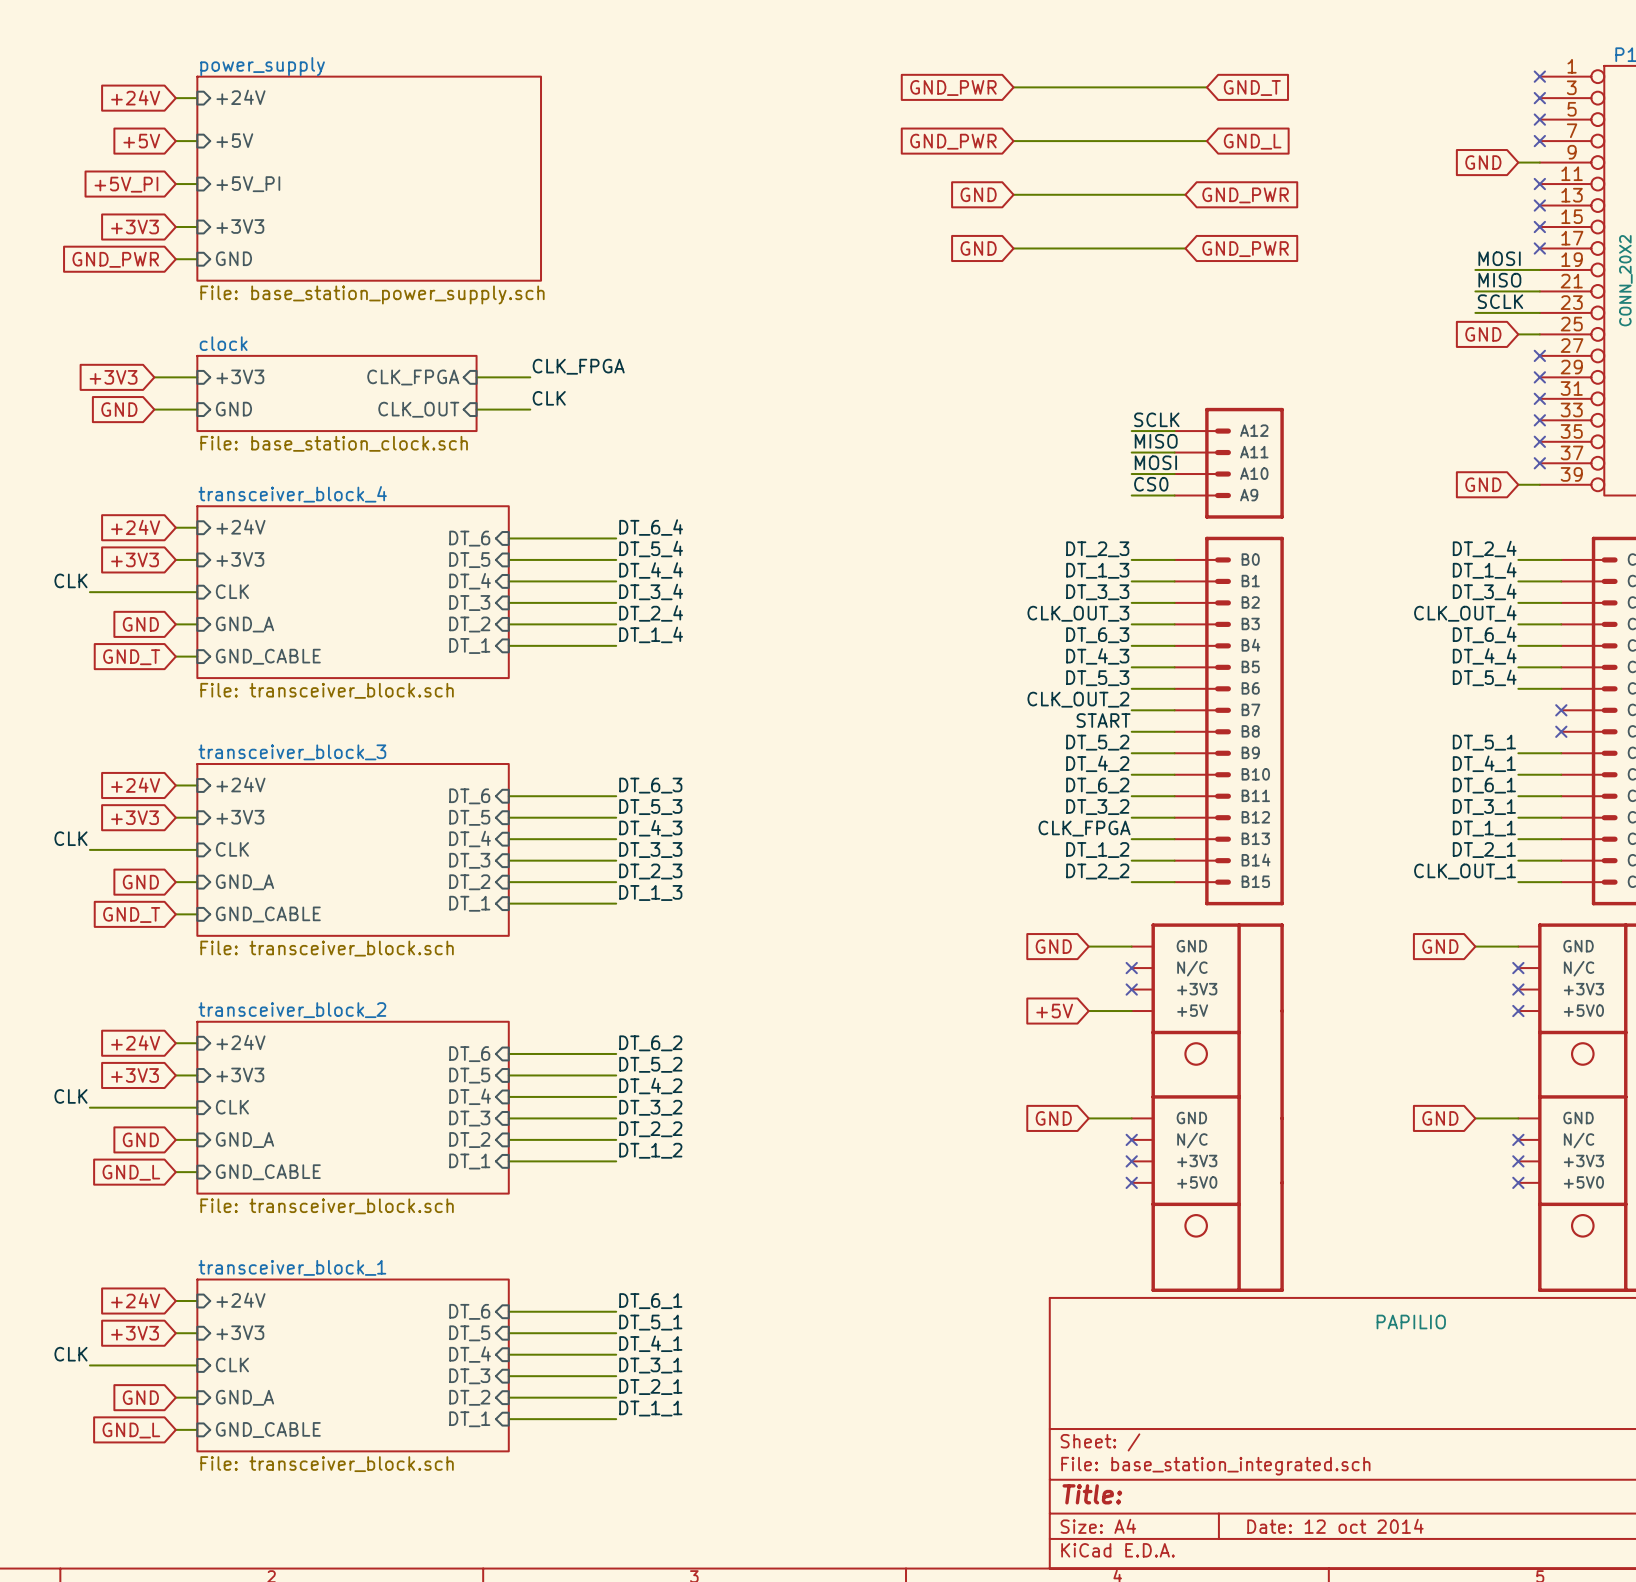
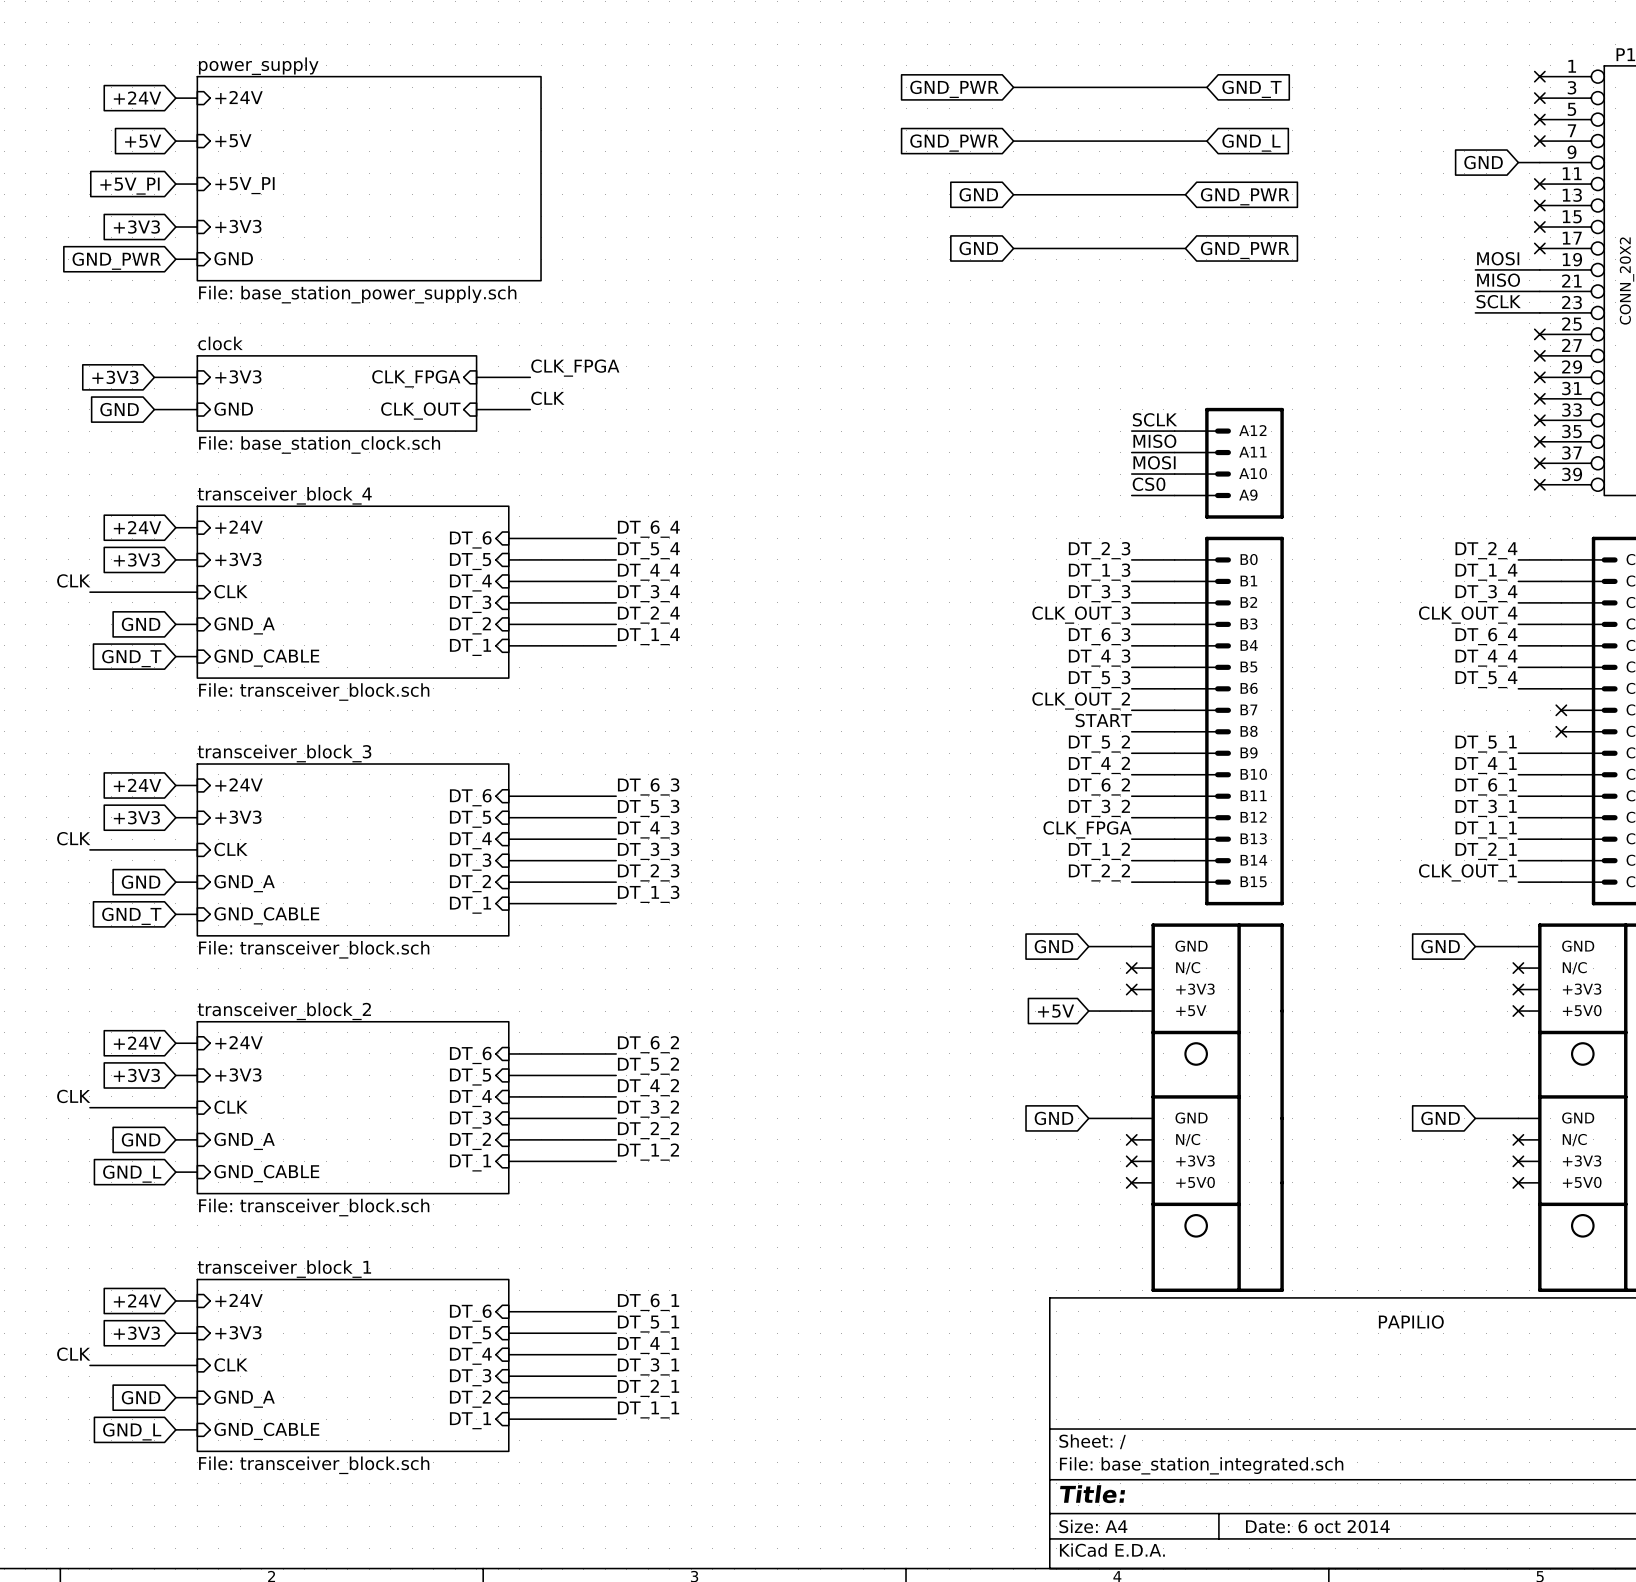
global label: GND (1483, 334) -> none
wire: (1518, 334) (1539, 334) -> none
no-connect mark: none -> (1539, 334)
global label: GND (1483, 484) -> none
wire: (1518, 484) (1539, 484) -> none
no-connect mark: none -> (1539, 484)
title block: Date: 12 oct 2014 (1335, 1526) -> Date: 6 oct 2014 (1317, 1526)

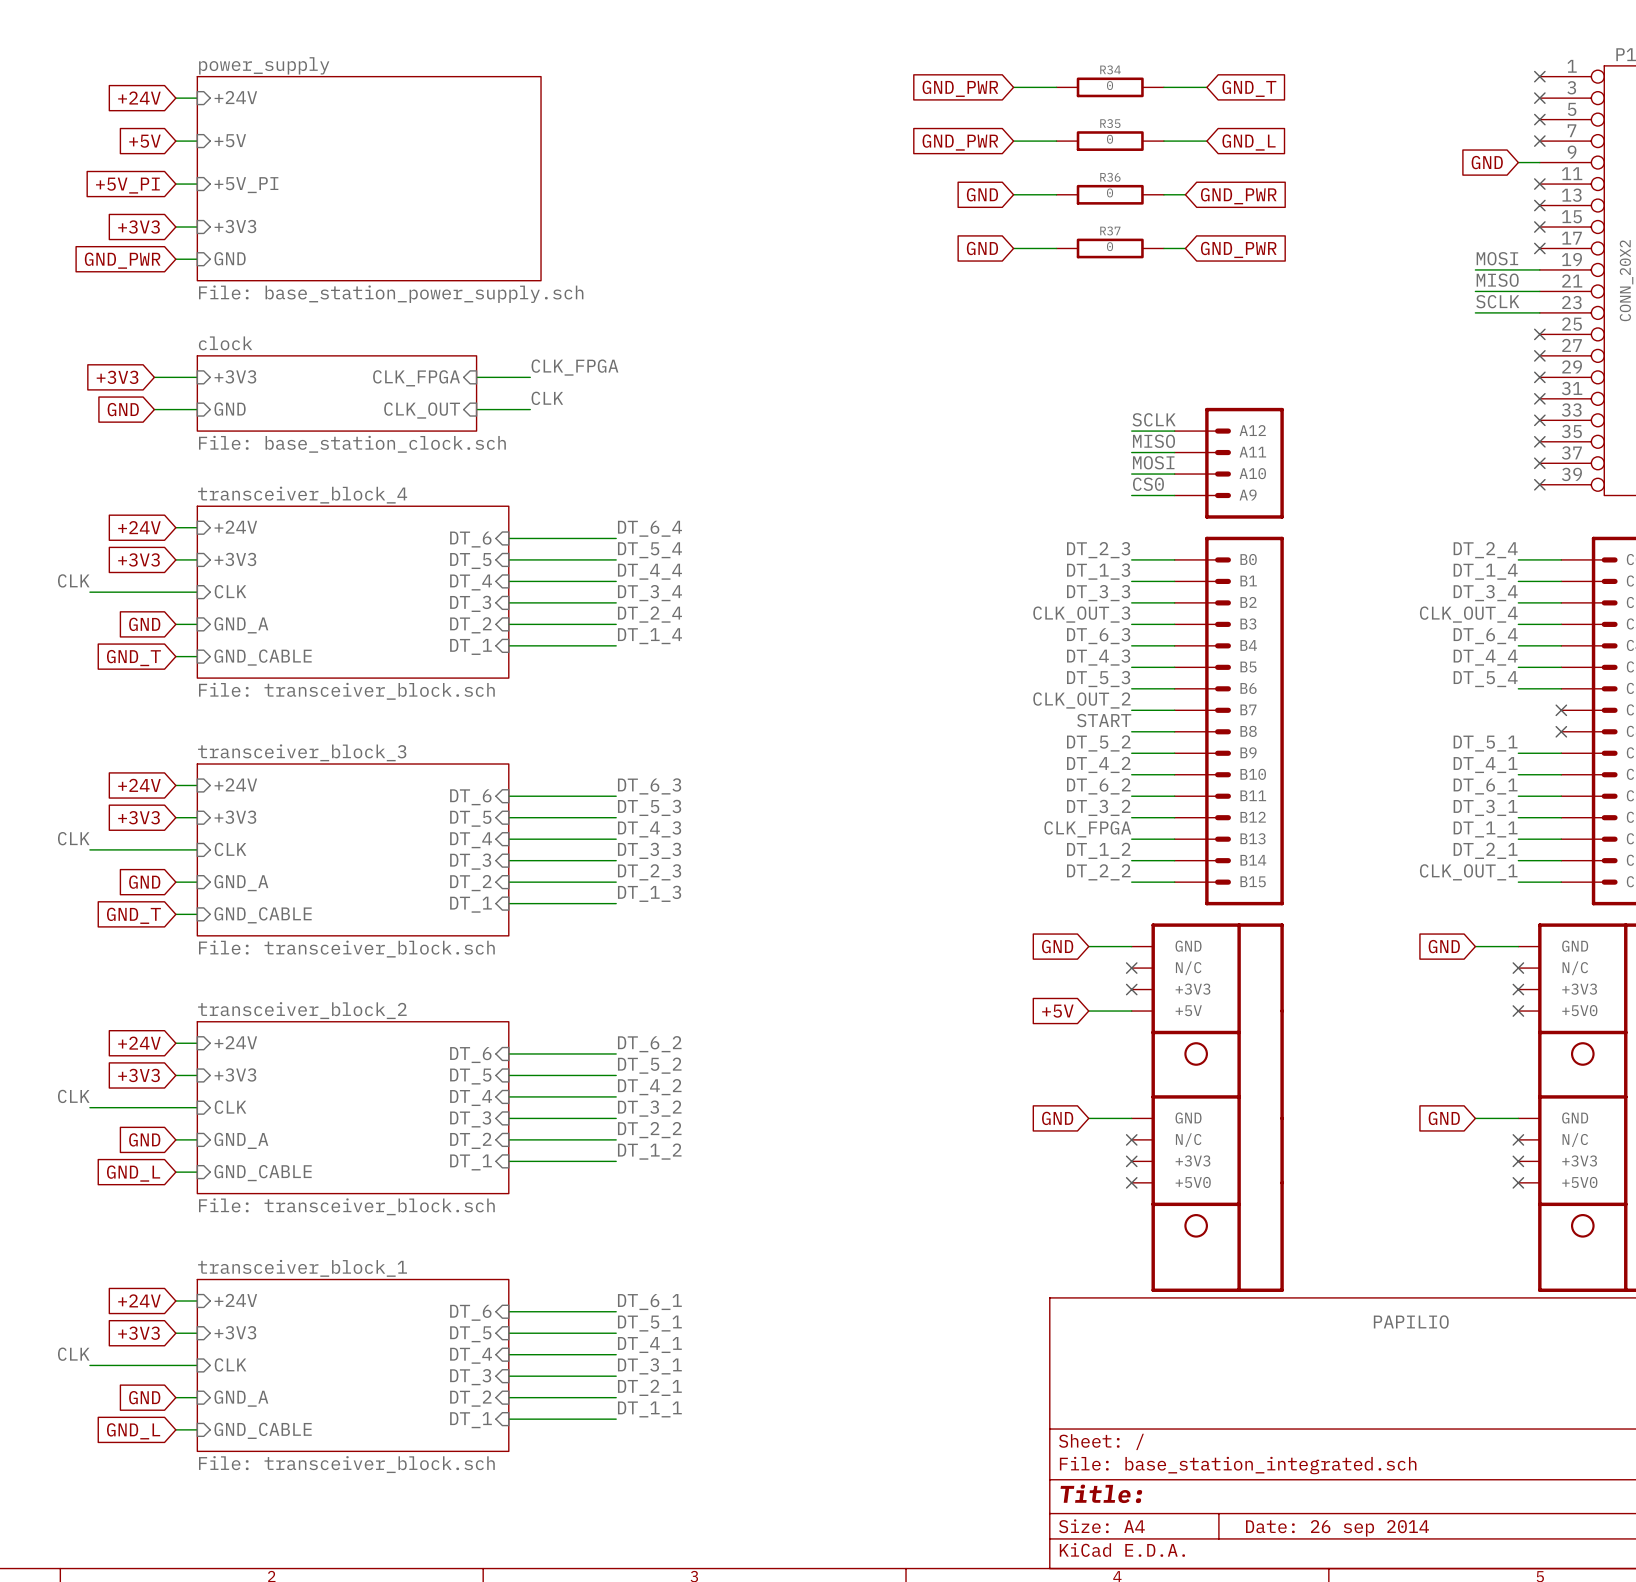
wire: (1056, 87) (1163, 87) -> none
R34: none -> 0 (1110, 87)
wire: (1056, 141) (1163, 141) -> none
R35: none -> 0 (1110, 141)
wire: (1056, 194) (1163, 194) -> none
R36: none -> 0 (1110, 194)
wire: (1056, 248) (1163, 248) -> none
R37: none -> 0 (1110, 248)
title block: Date: 6 oct 2014 (1317, 1526) -> Date: 26 sep 2014 (1337, 1528)

